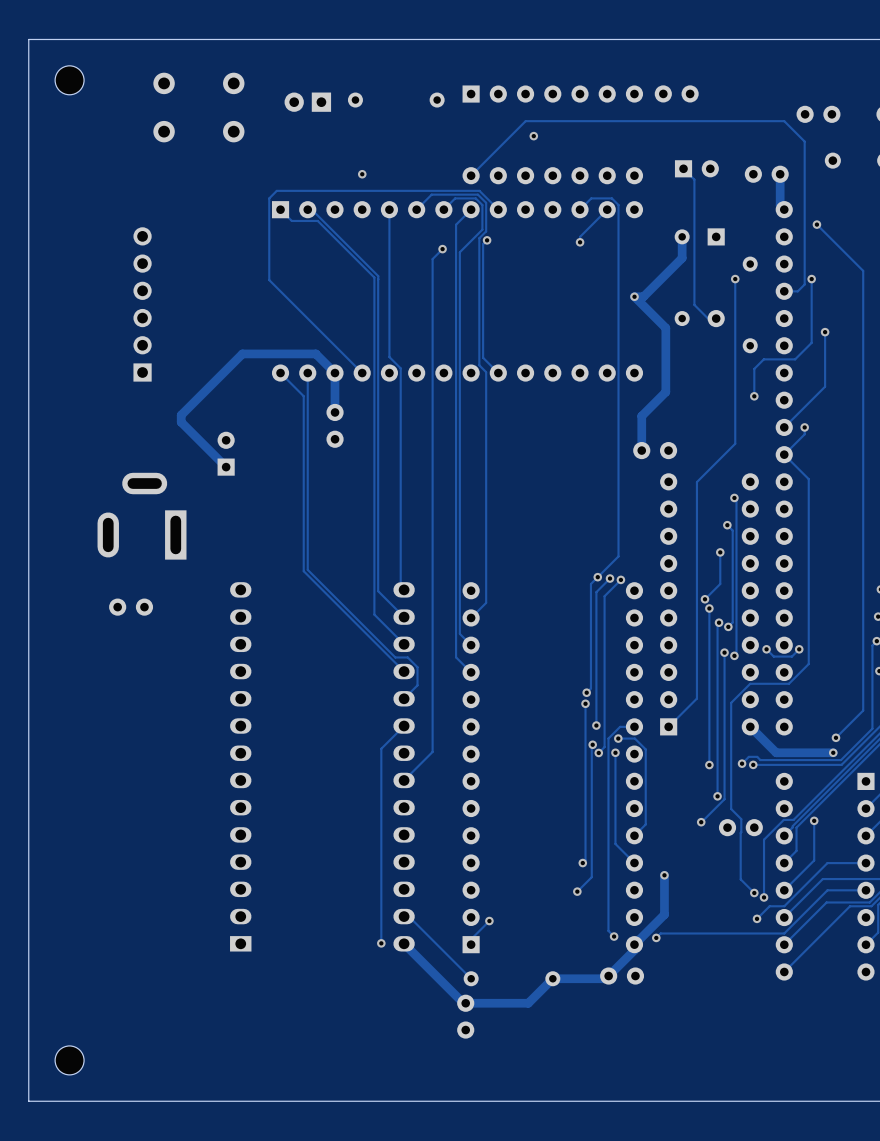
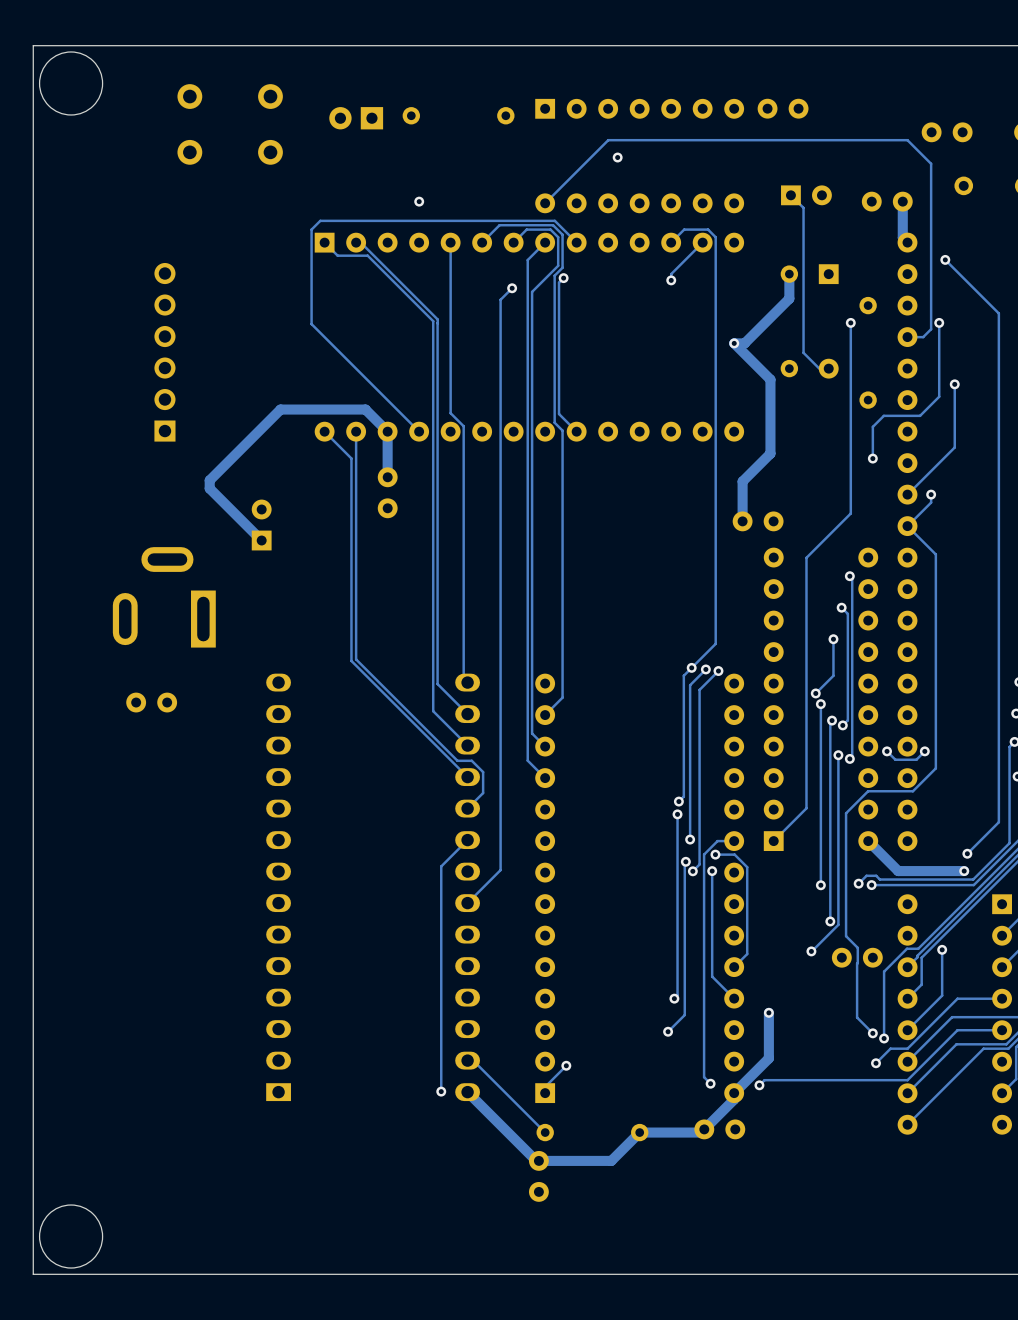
round board edge: none -> [38, 51, 104, 116]
part: (69, 80) -> none
round board edge: none -> [38, 1204, 104, 1269]
part: (69, 1060) -> none

